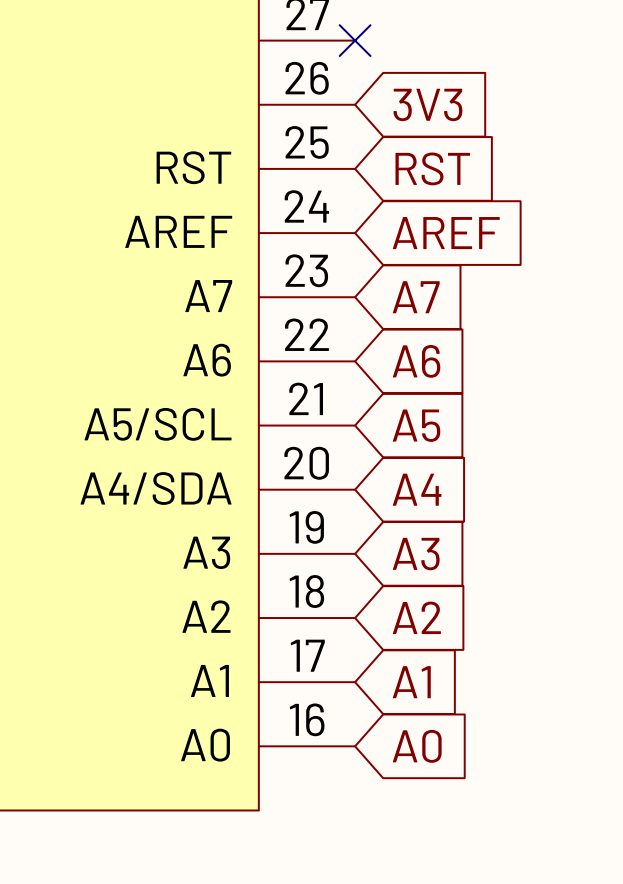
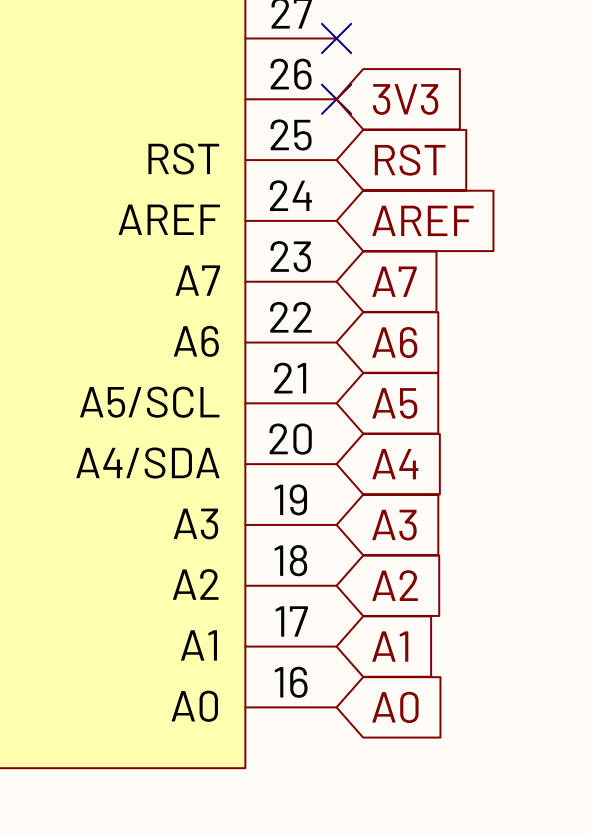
no-connect mark: none -> (336, 99)

